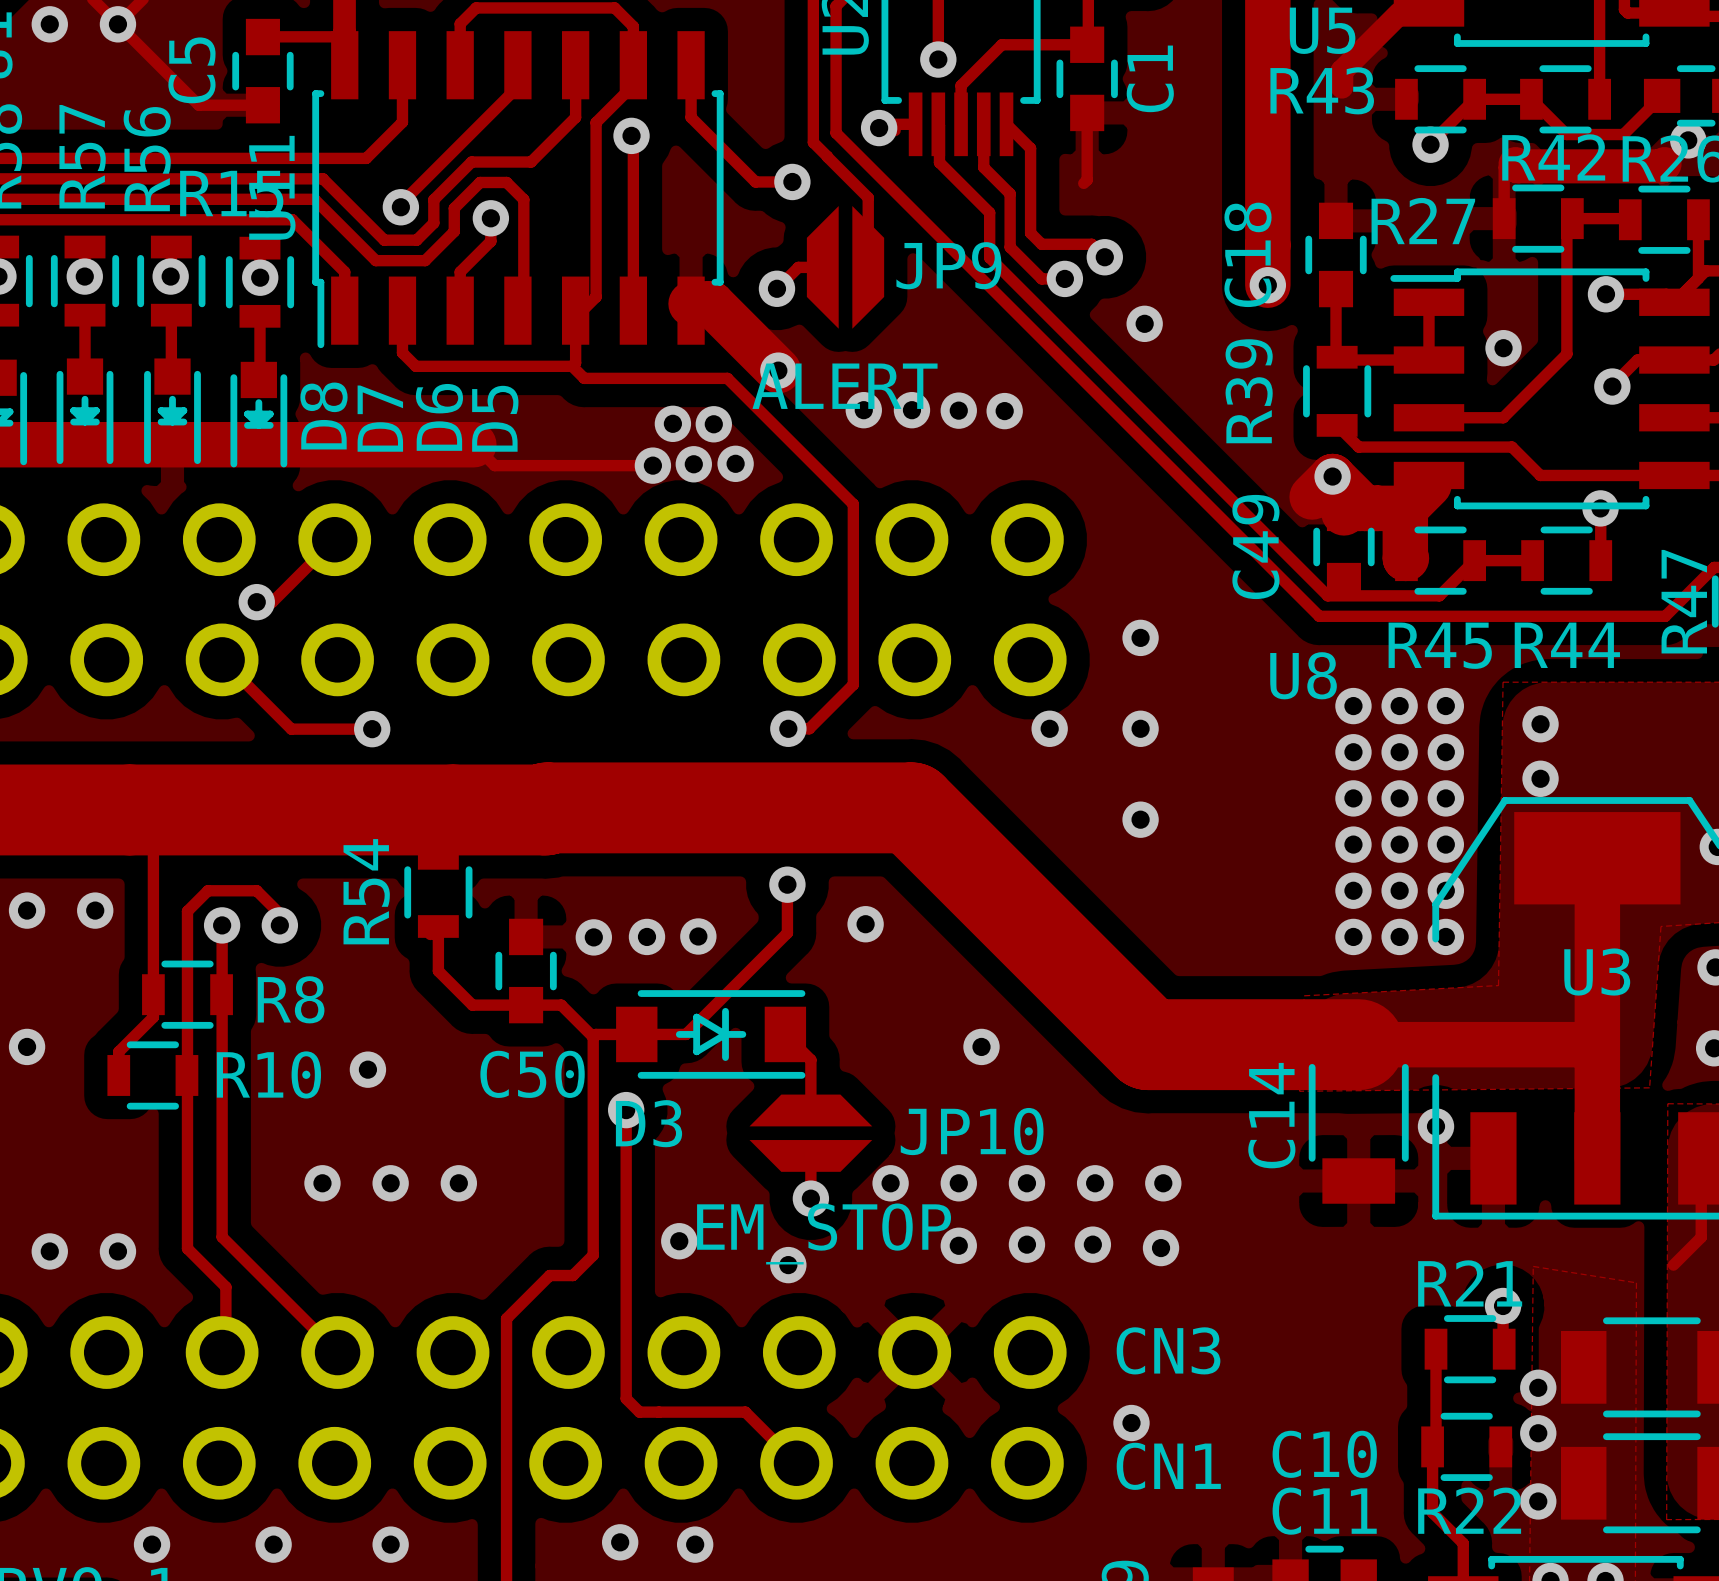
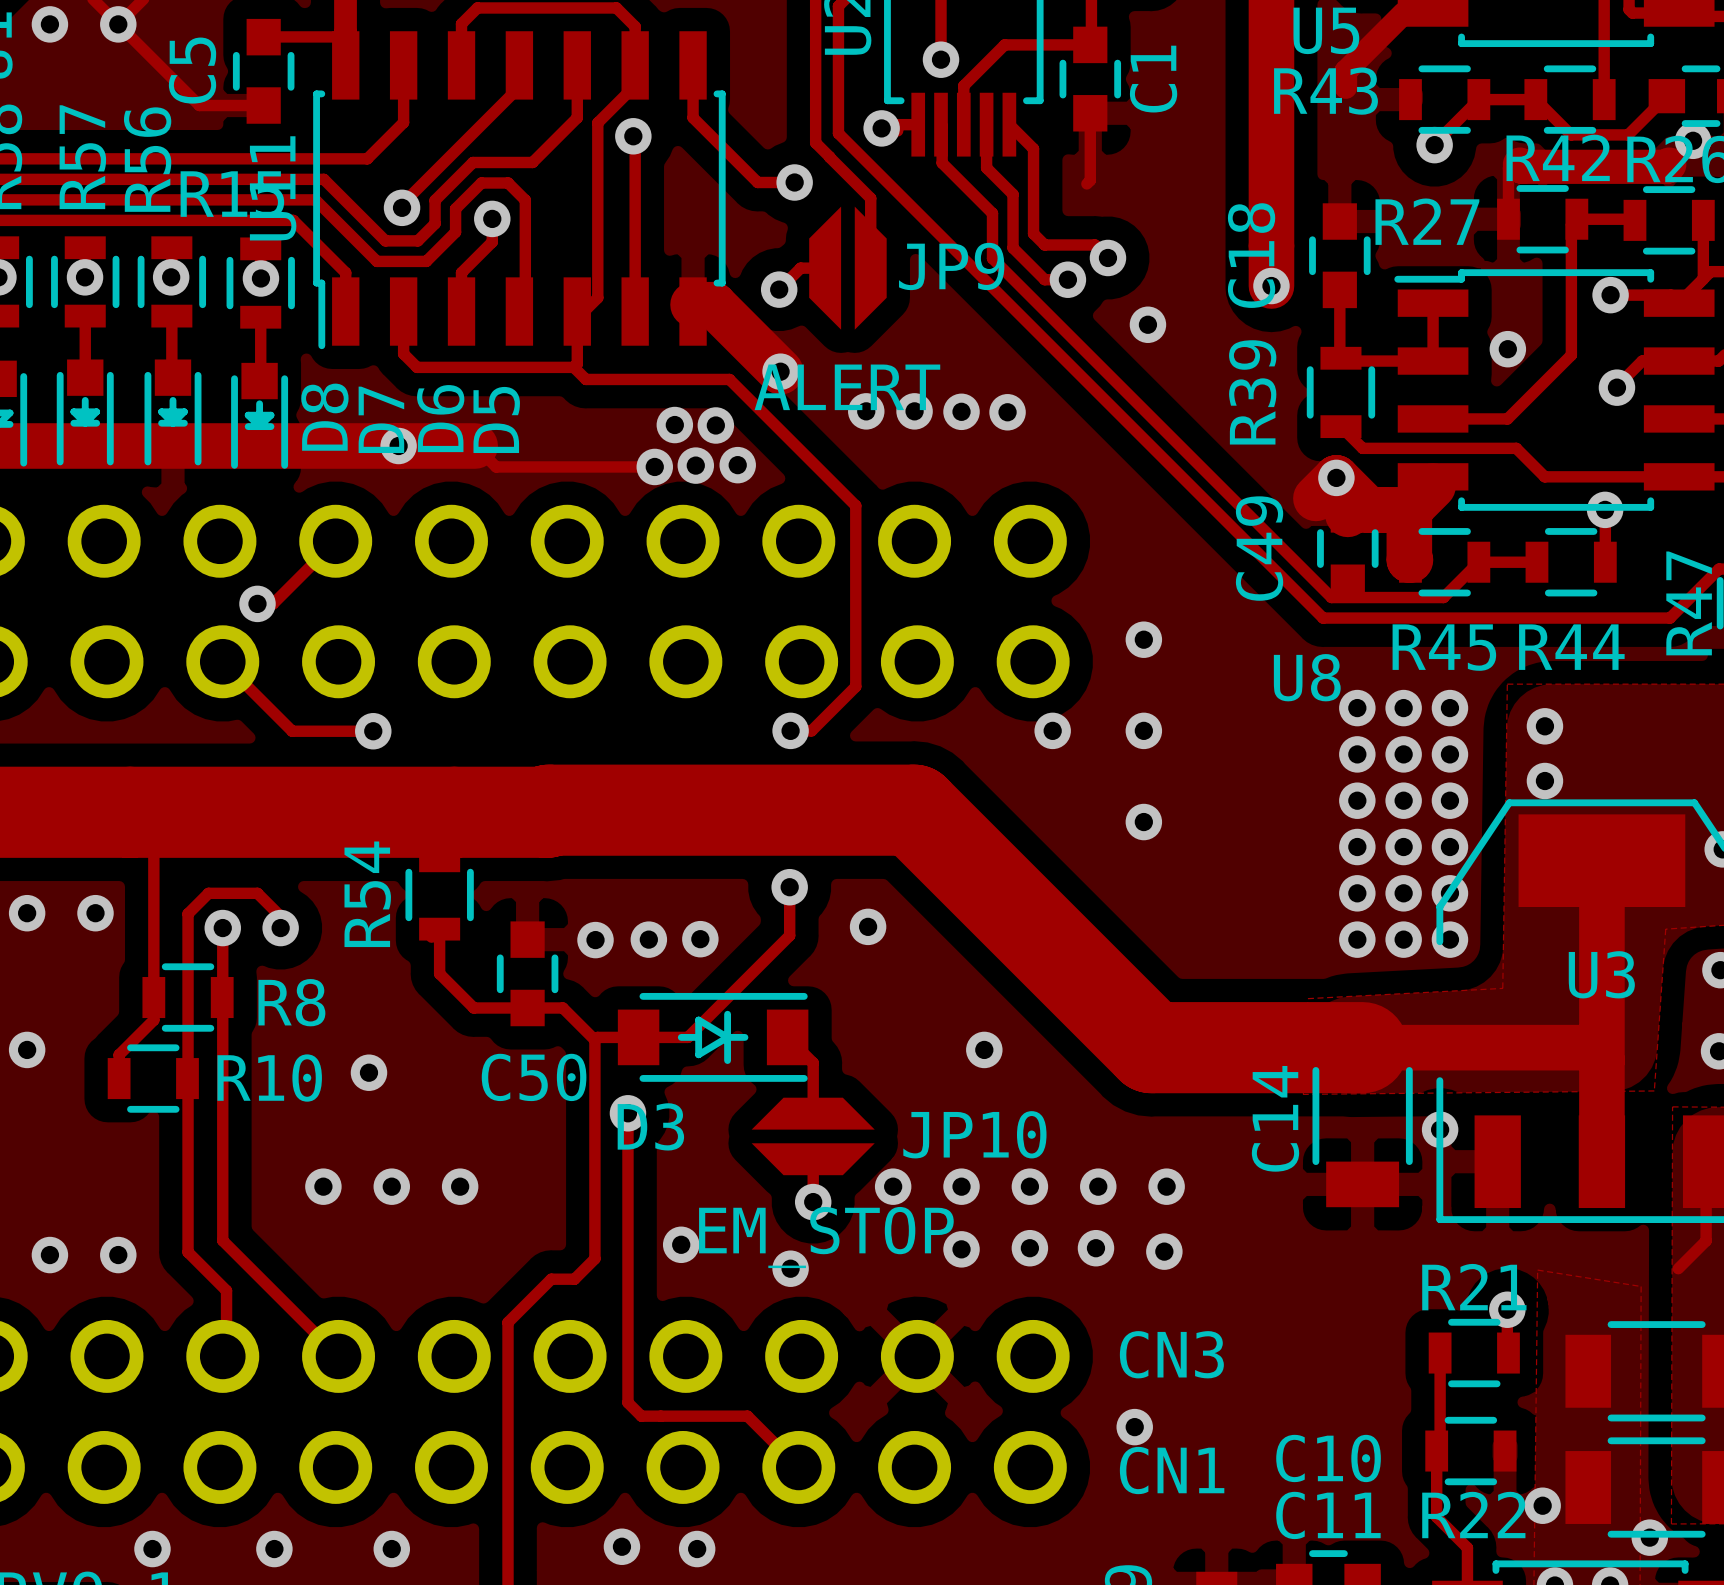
via: none -> (398, 446)
via: (1538, 1387) -> none
via: (1538, 1433) -> none
via: none -> (1649, 1537)

